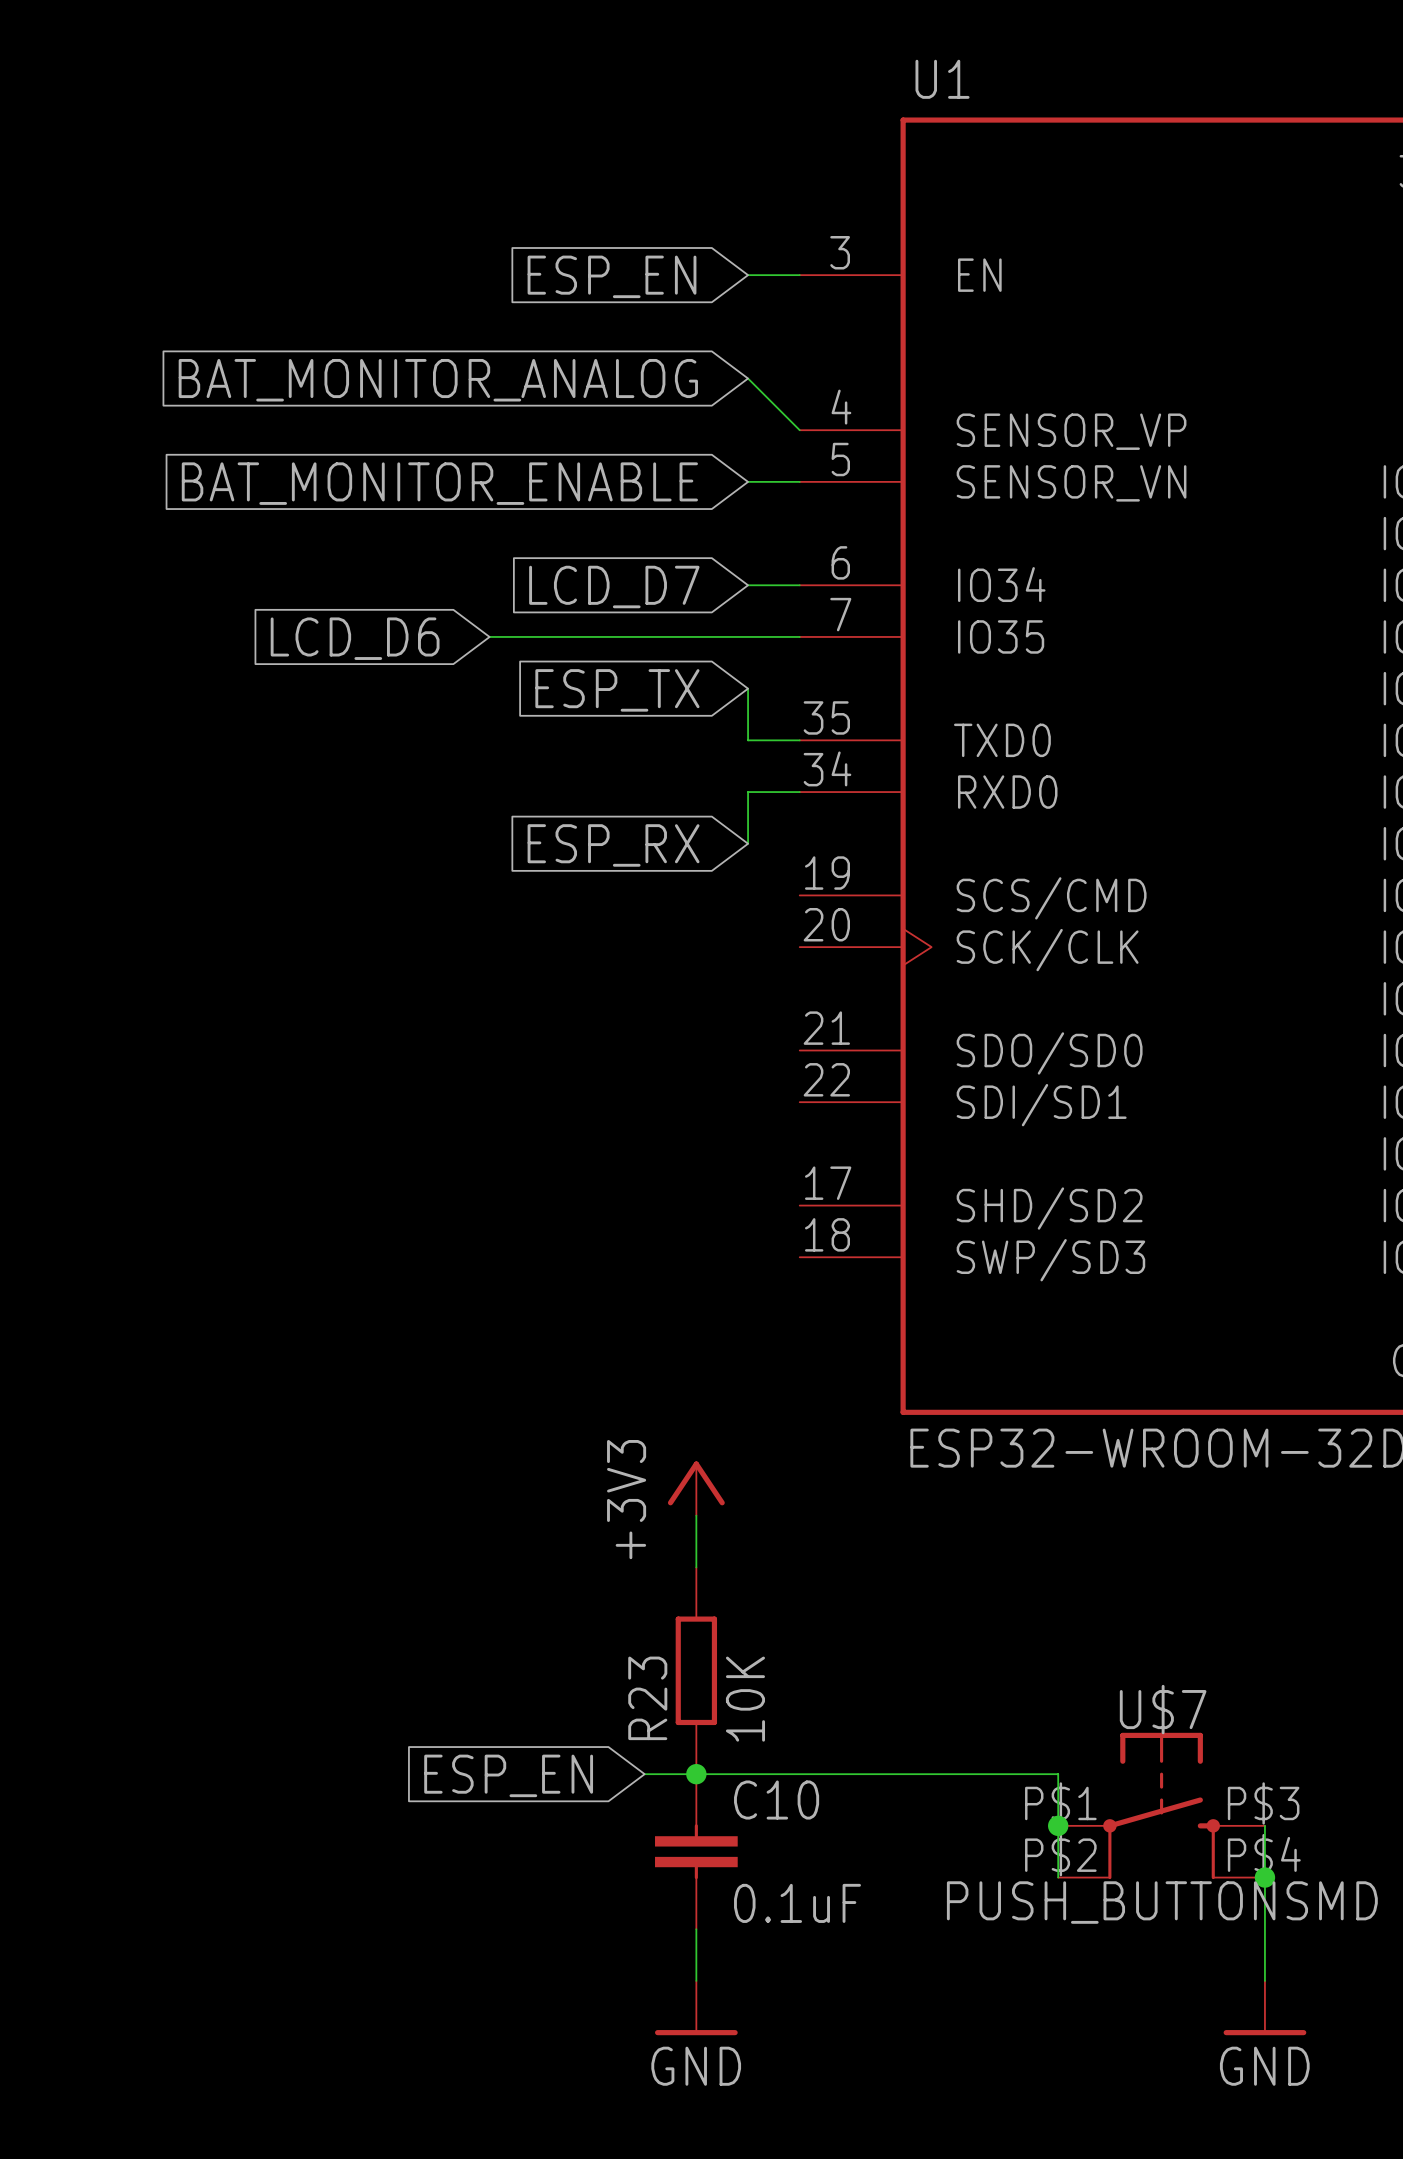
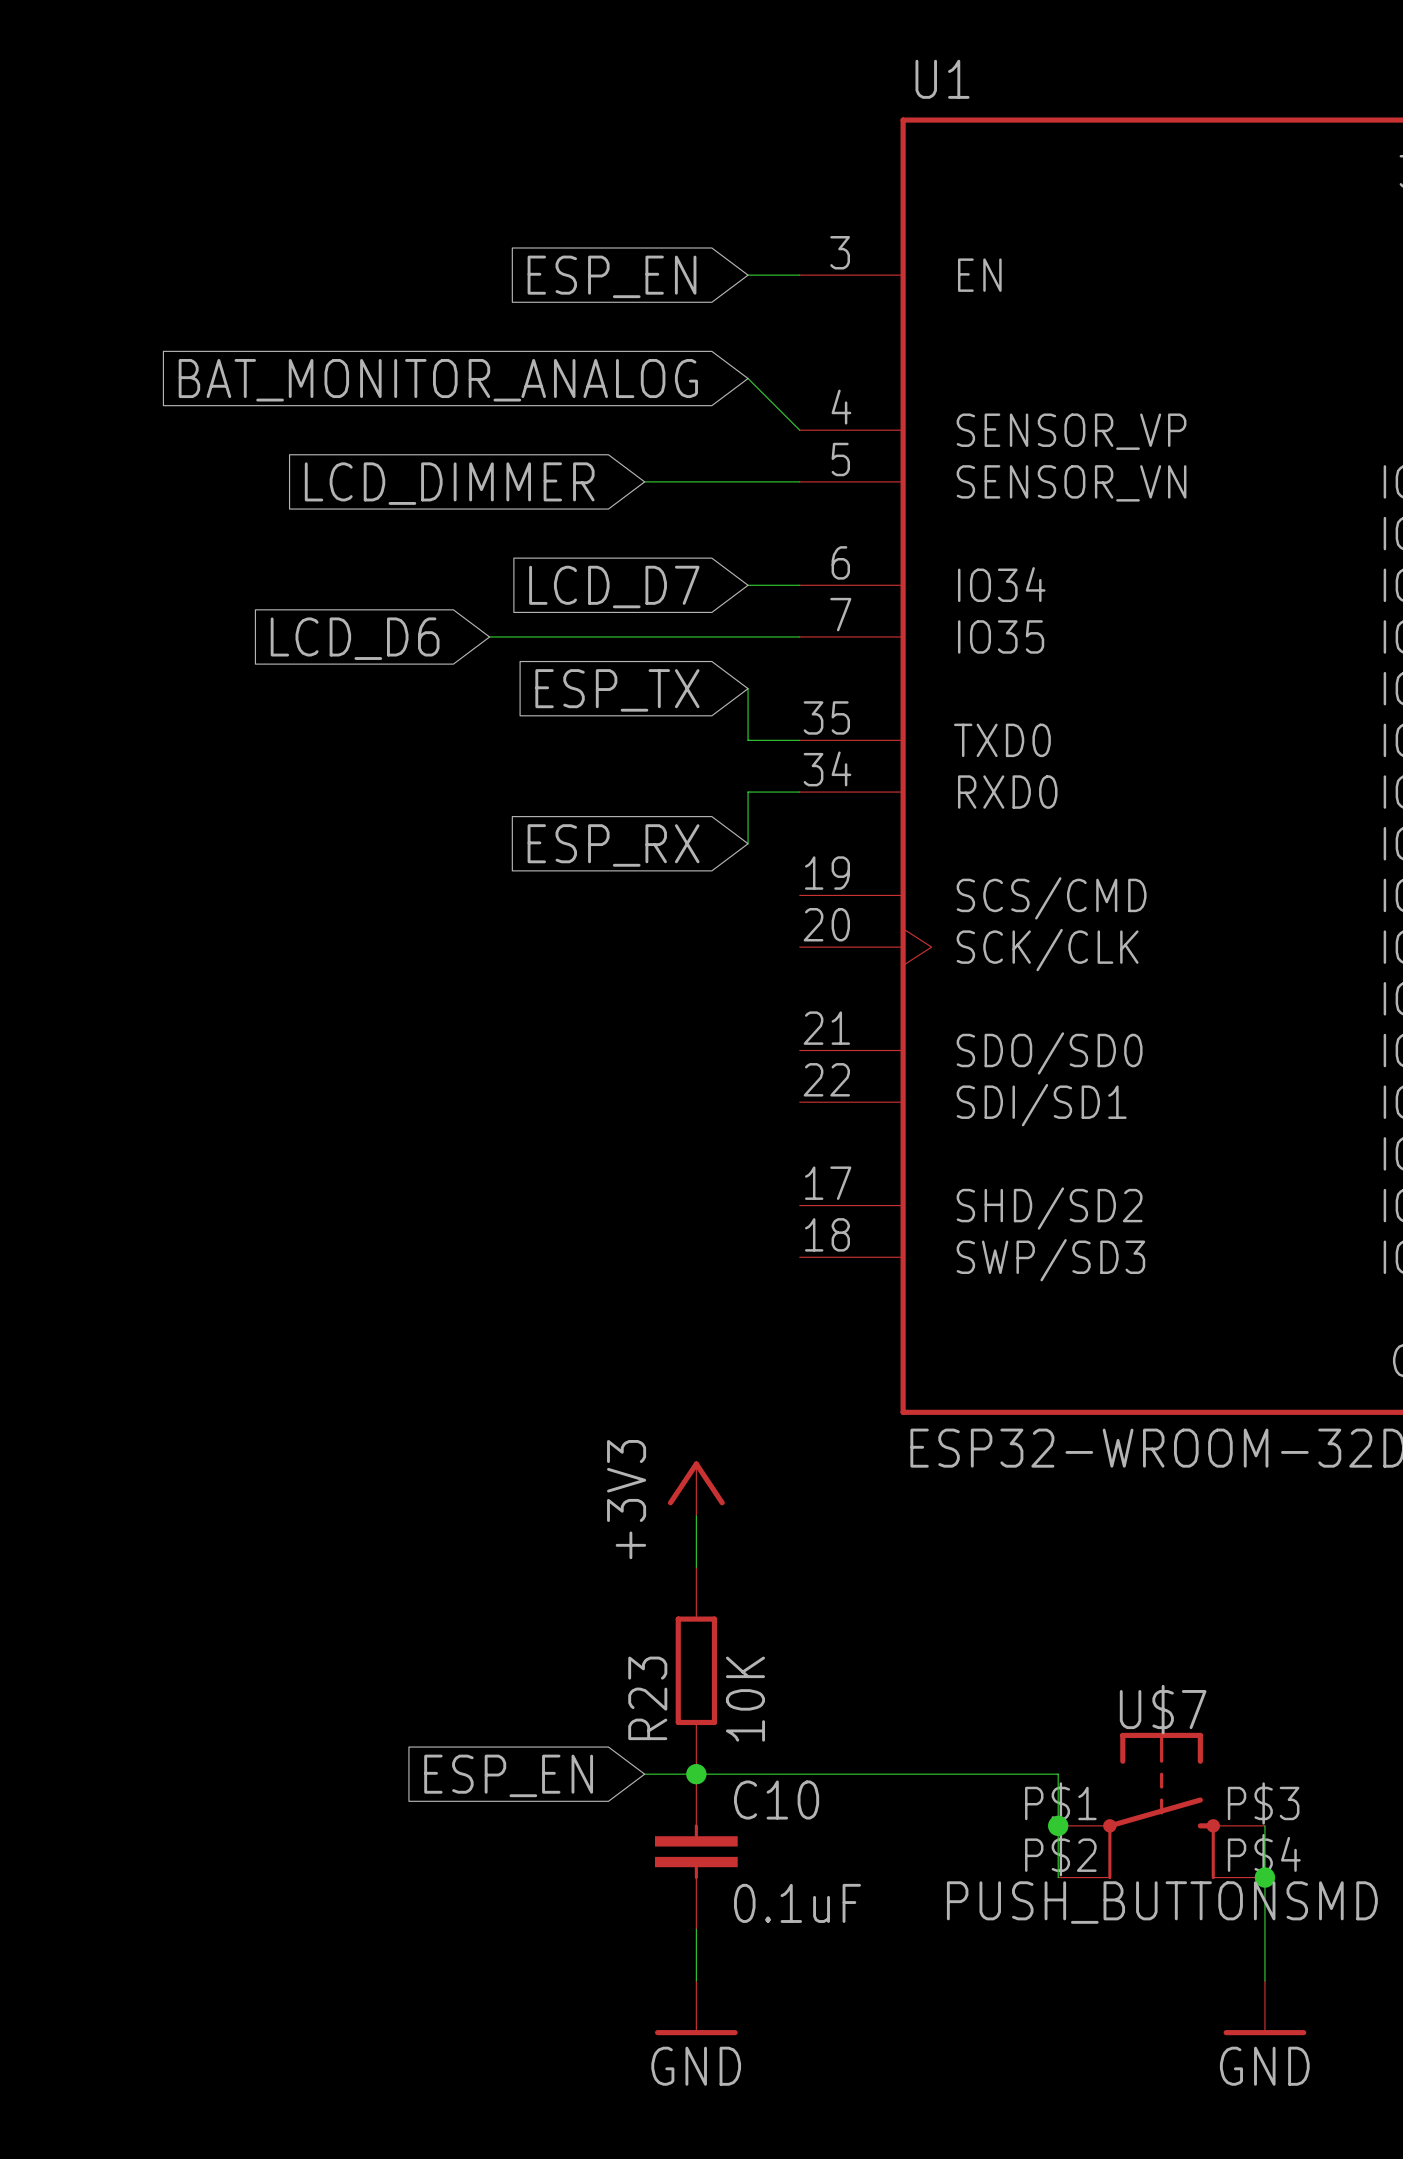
wire: none -> (644, 481) (748, 481)
global label: BAT_MONITOR_ENABLE (439, 483) -> none
global label: none -> LCD_DIMMER (449, 483)

